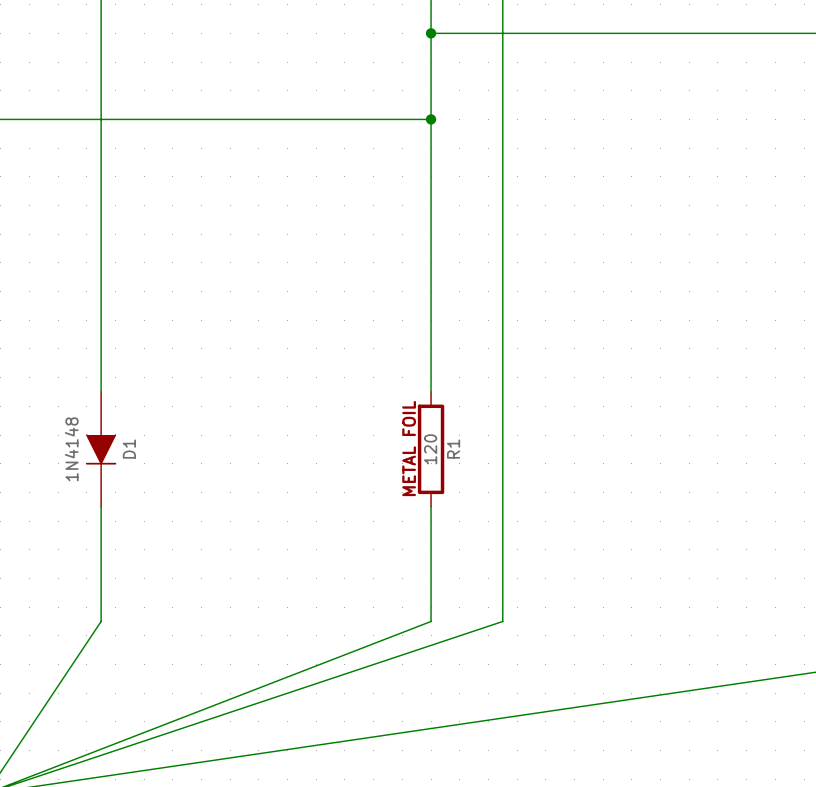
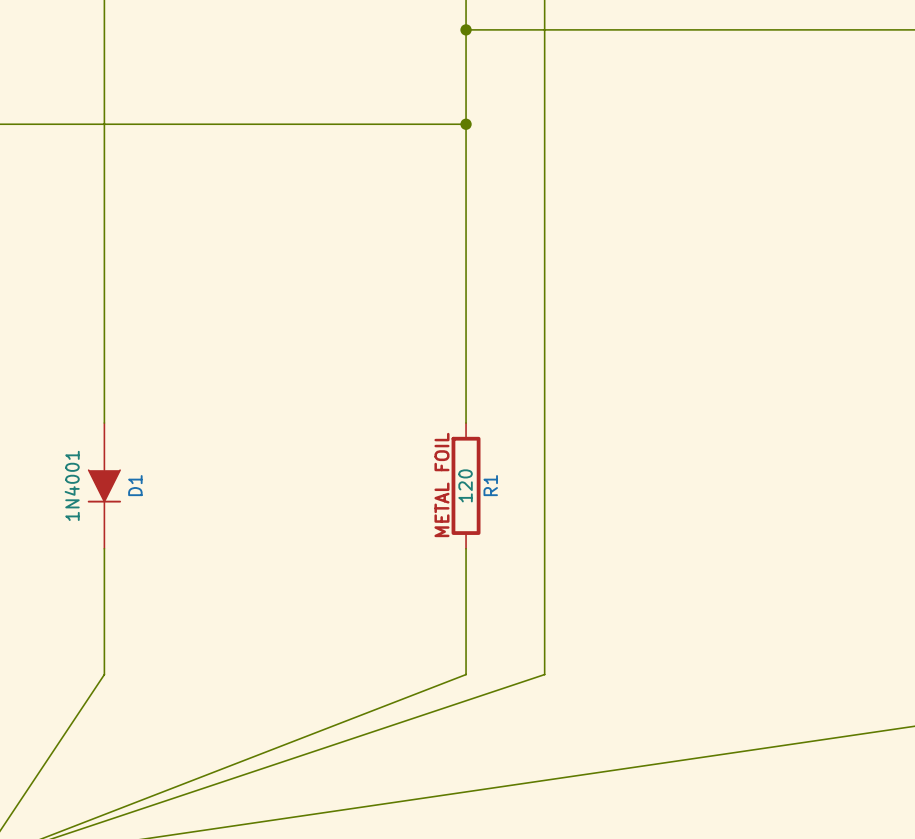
D1 value: 1N4148 (71, 449) -> 1N4001 (72, 485)

